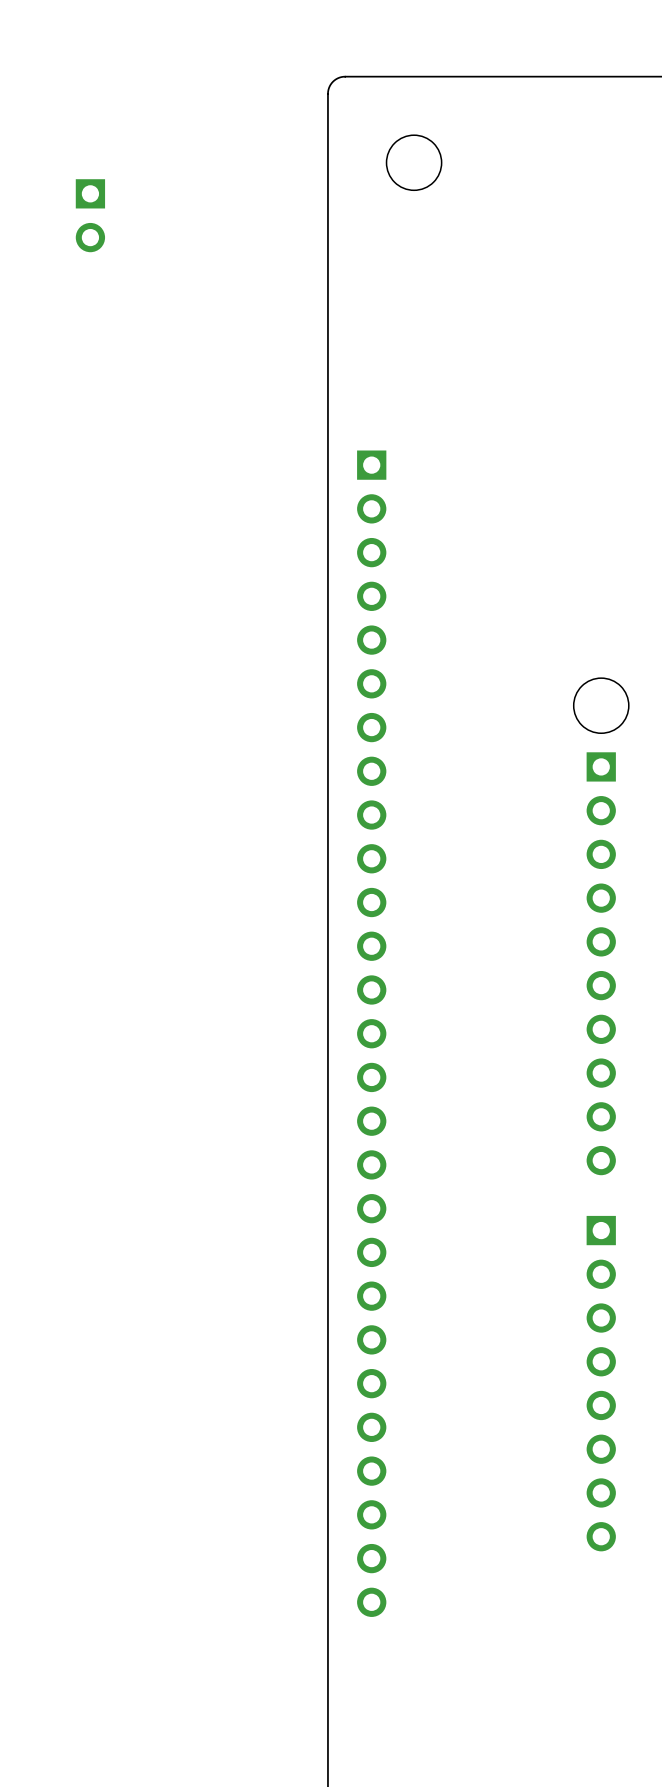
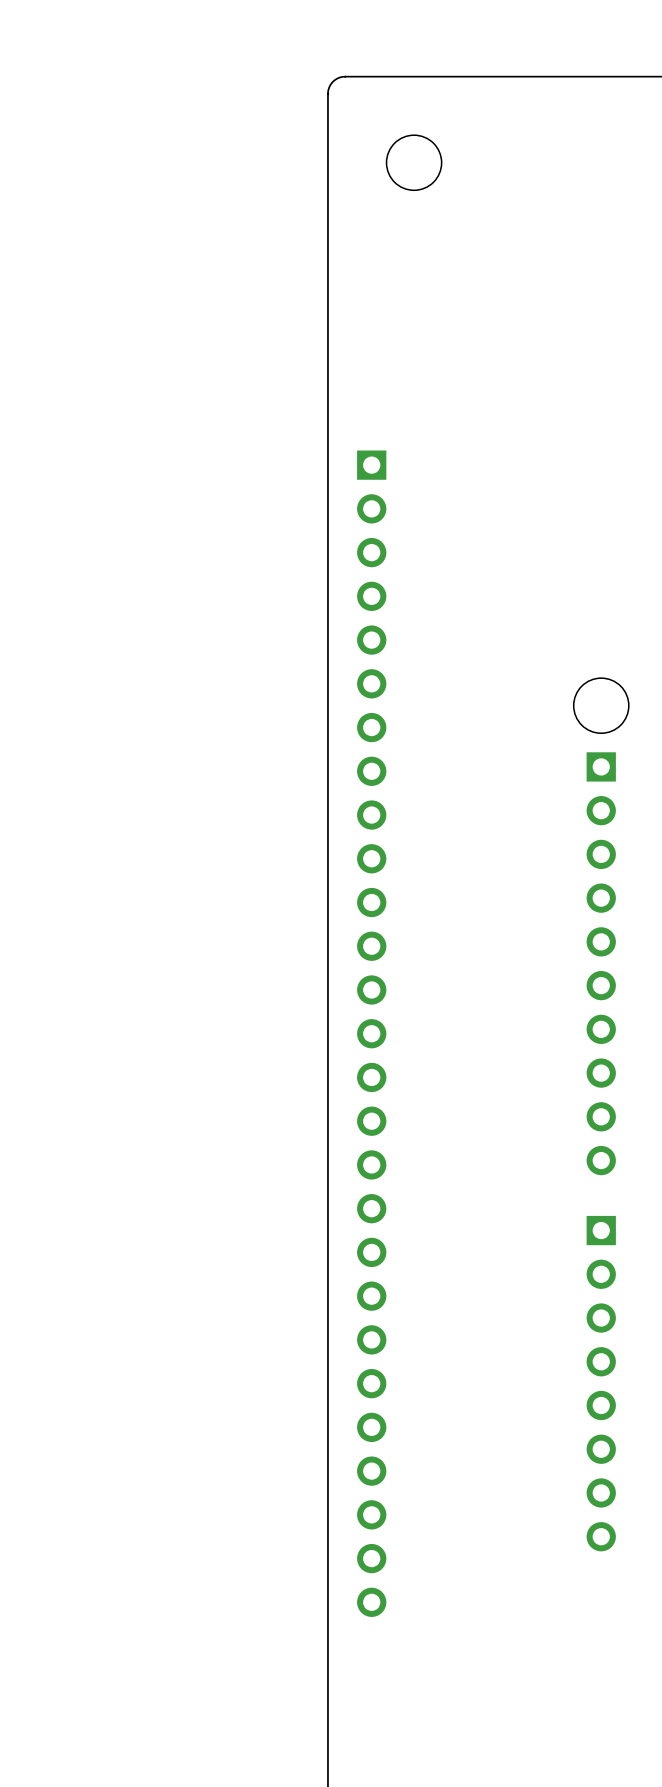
part: (90, 215) -> none

